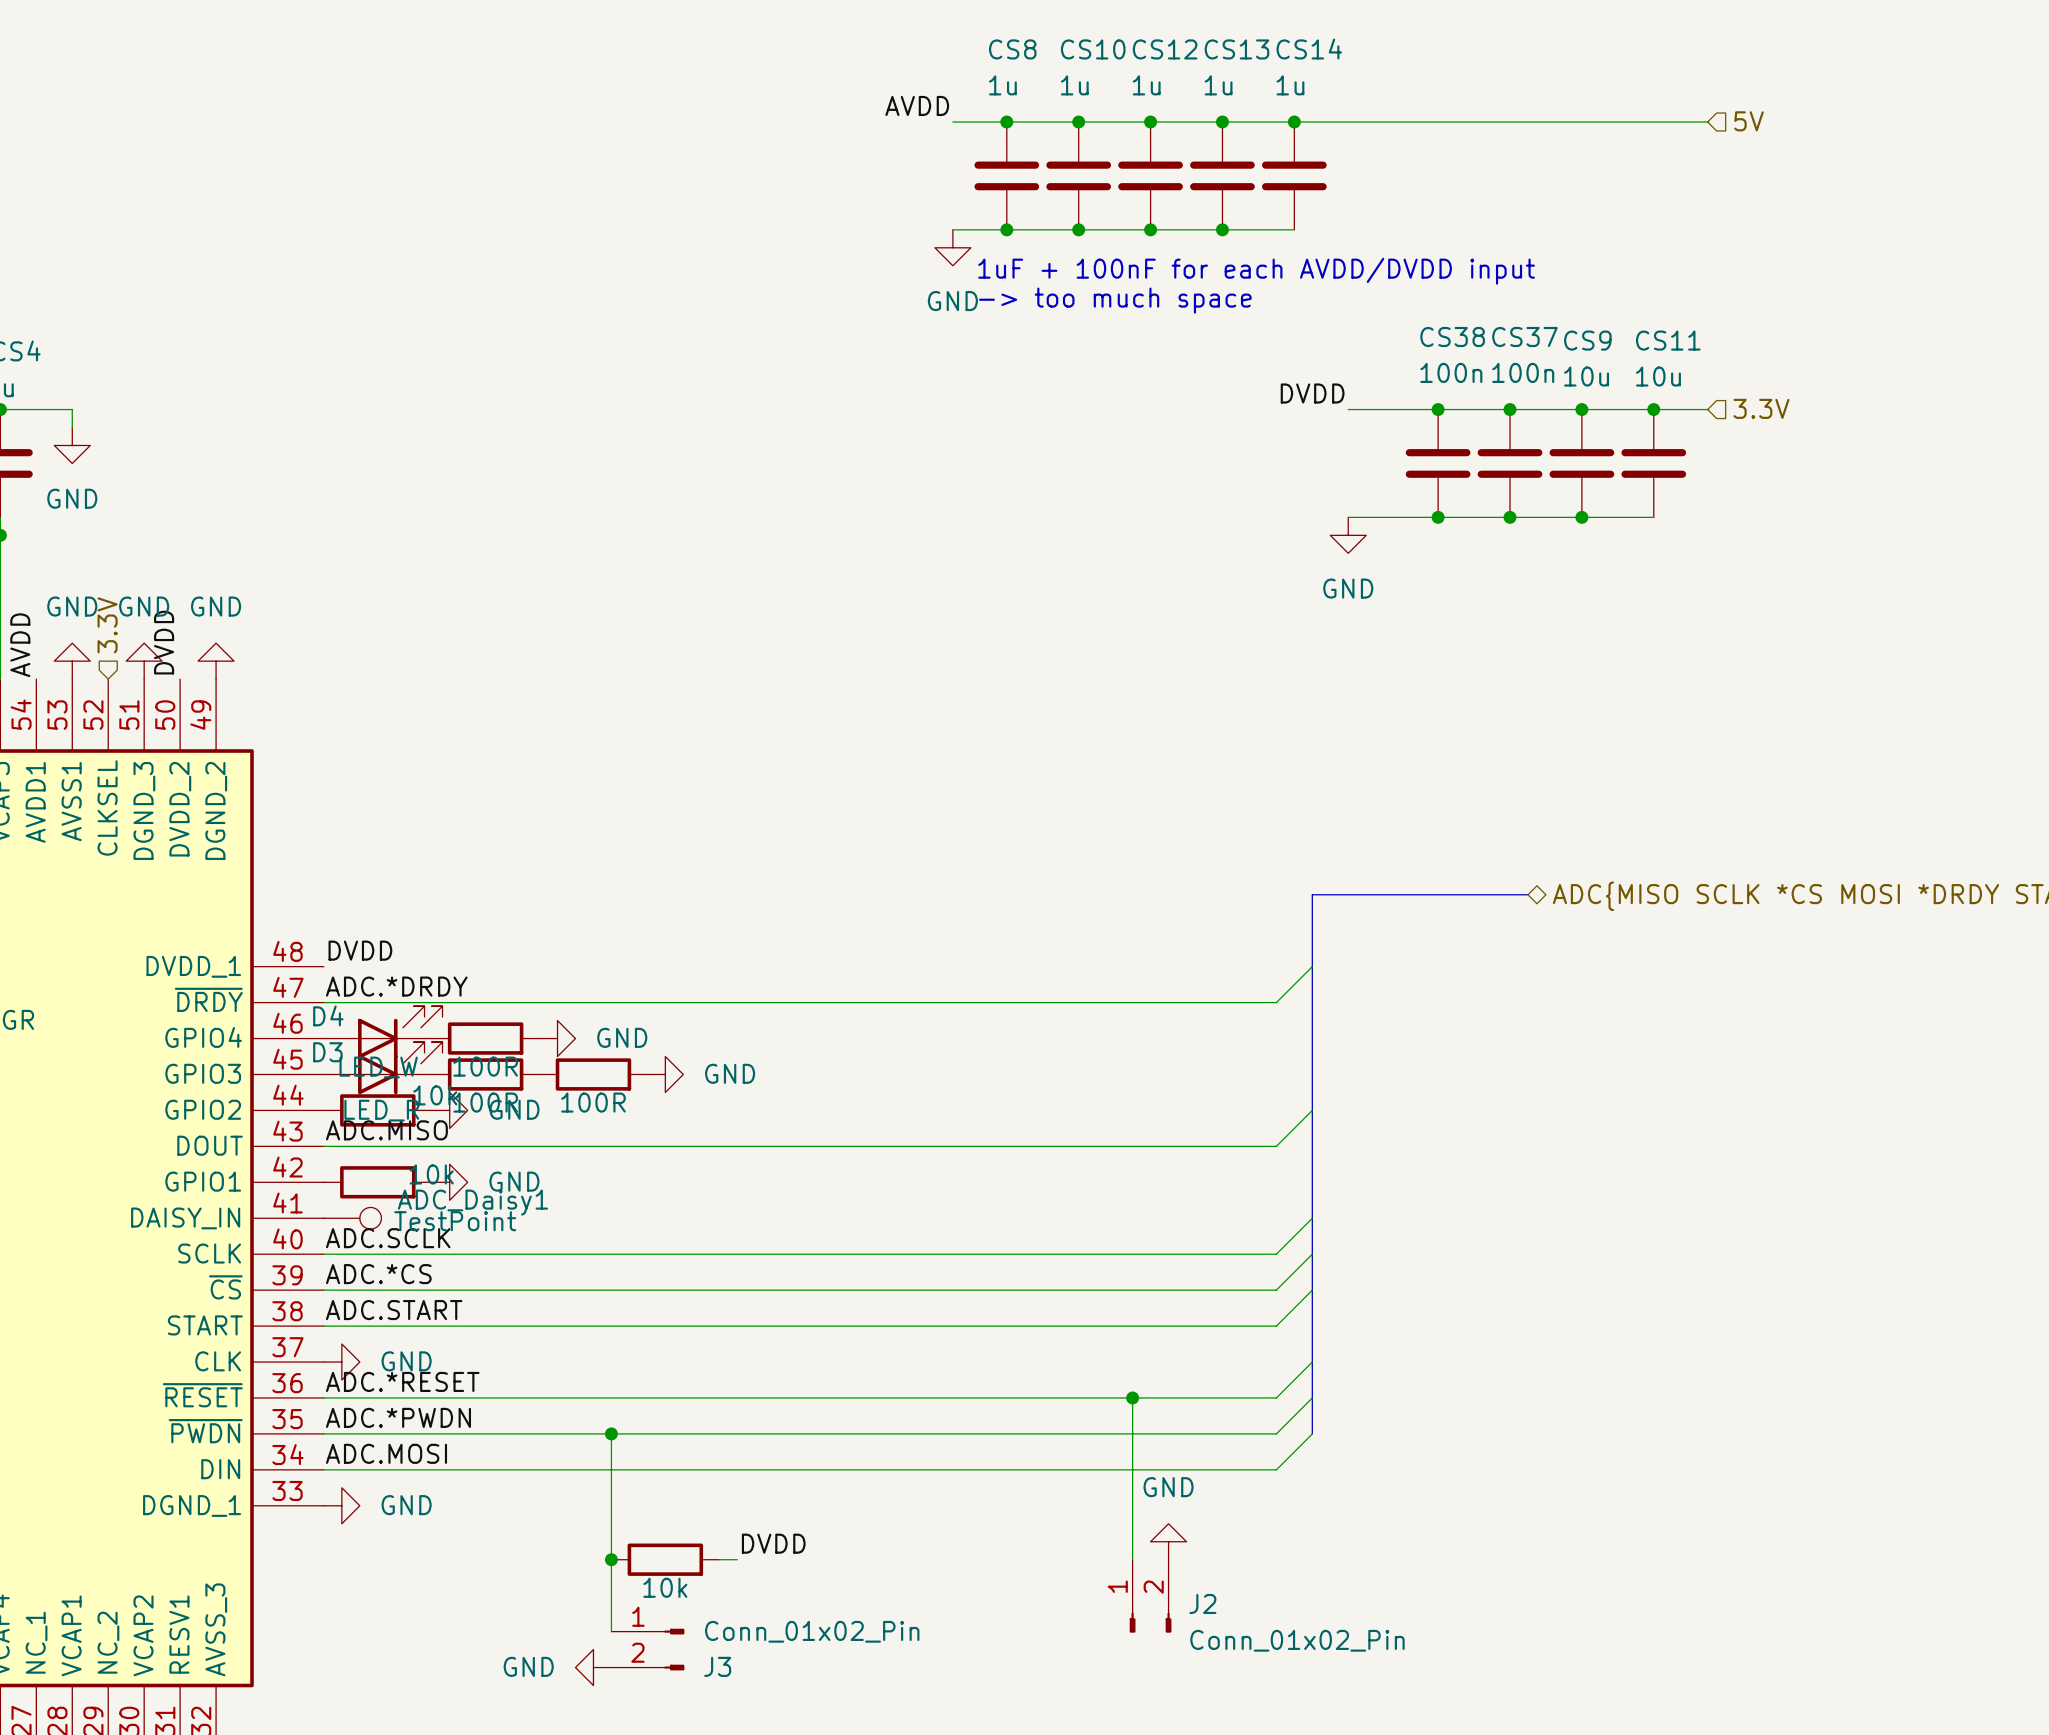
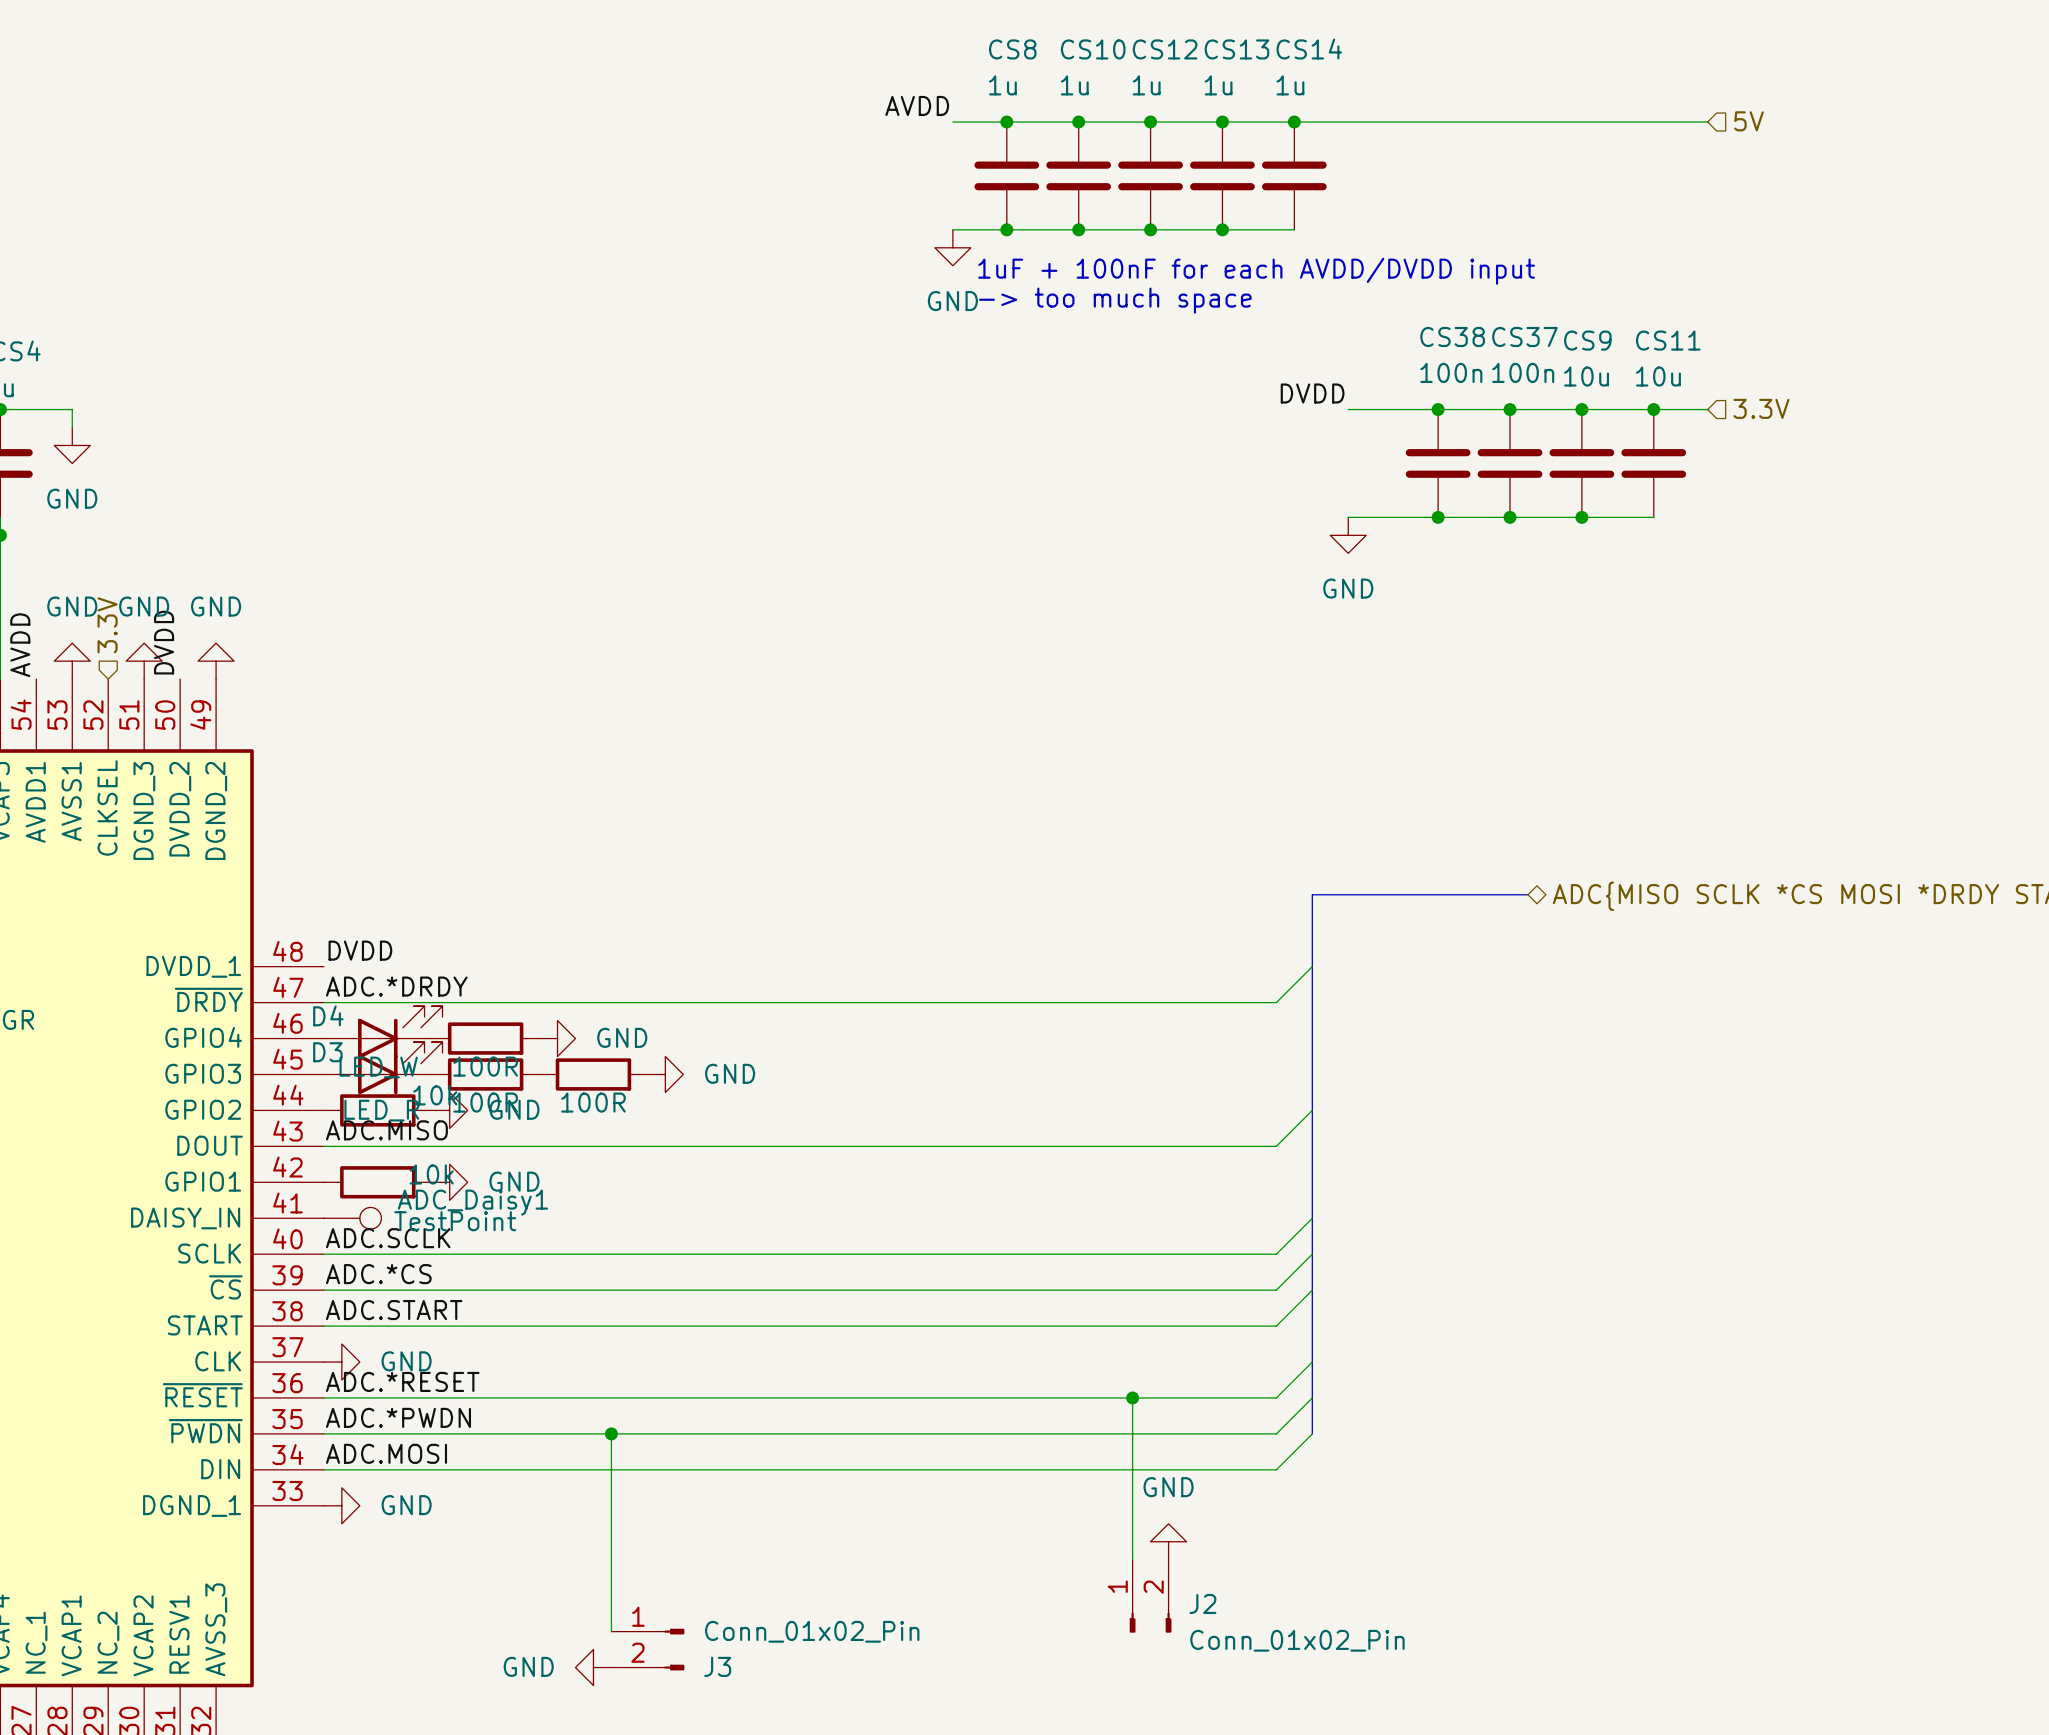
label: DVDD (773, 1543) -> none
junction: (611, 1559) -> none
part: 10k (665, 1559) -> none
wire: (719, 1559) (737, 1559) -> none

